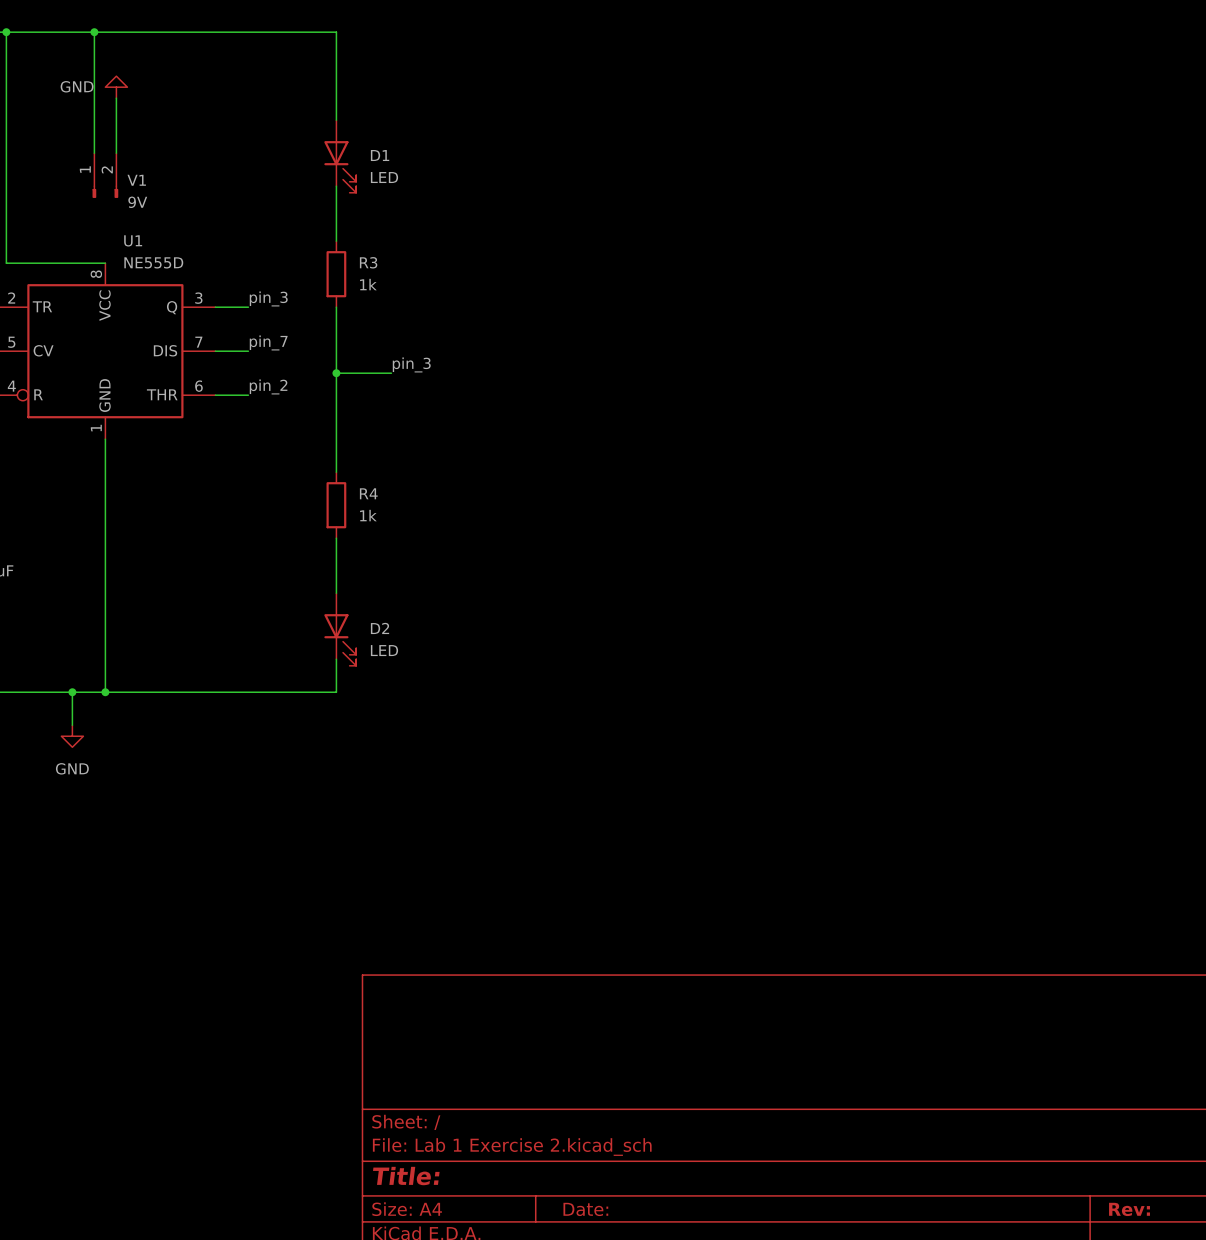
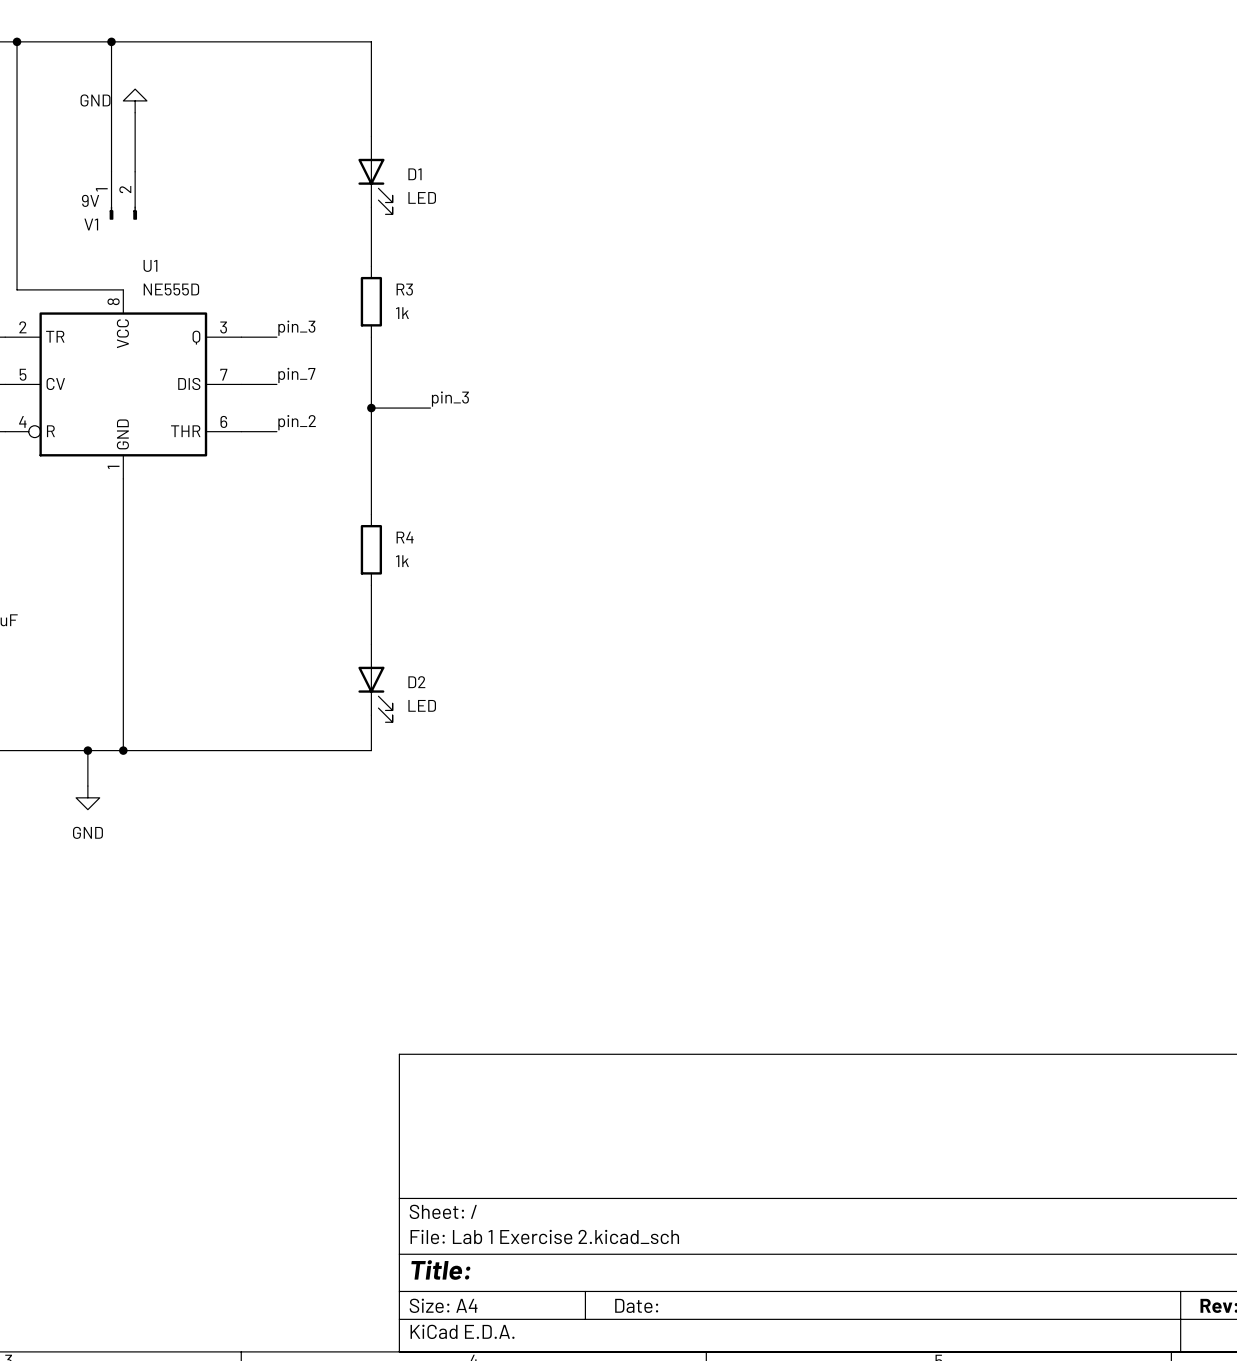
V1 name position: V1 (136, 180) -> V1 (91, 224)
V1 value position: 9V (137, 202) -> 9V (90, 200)

